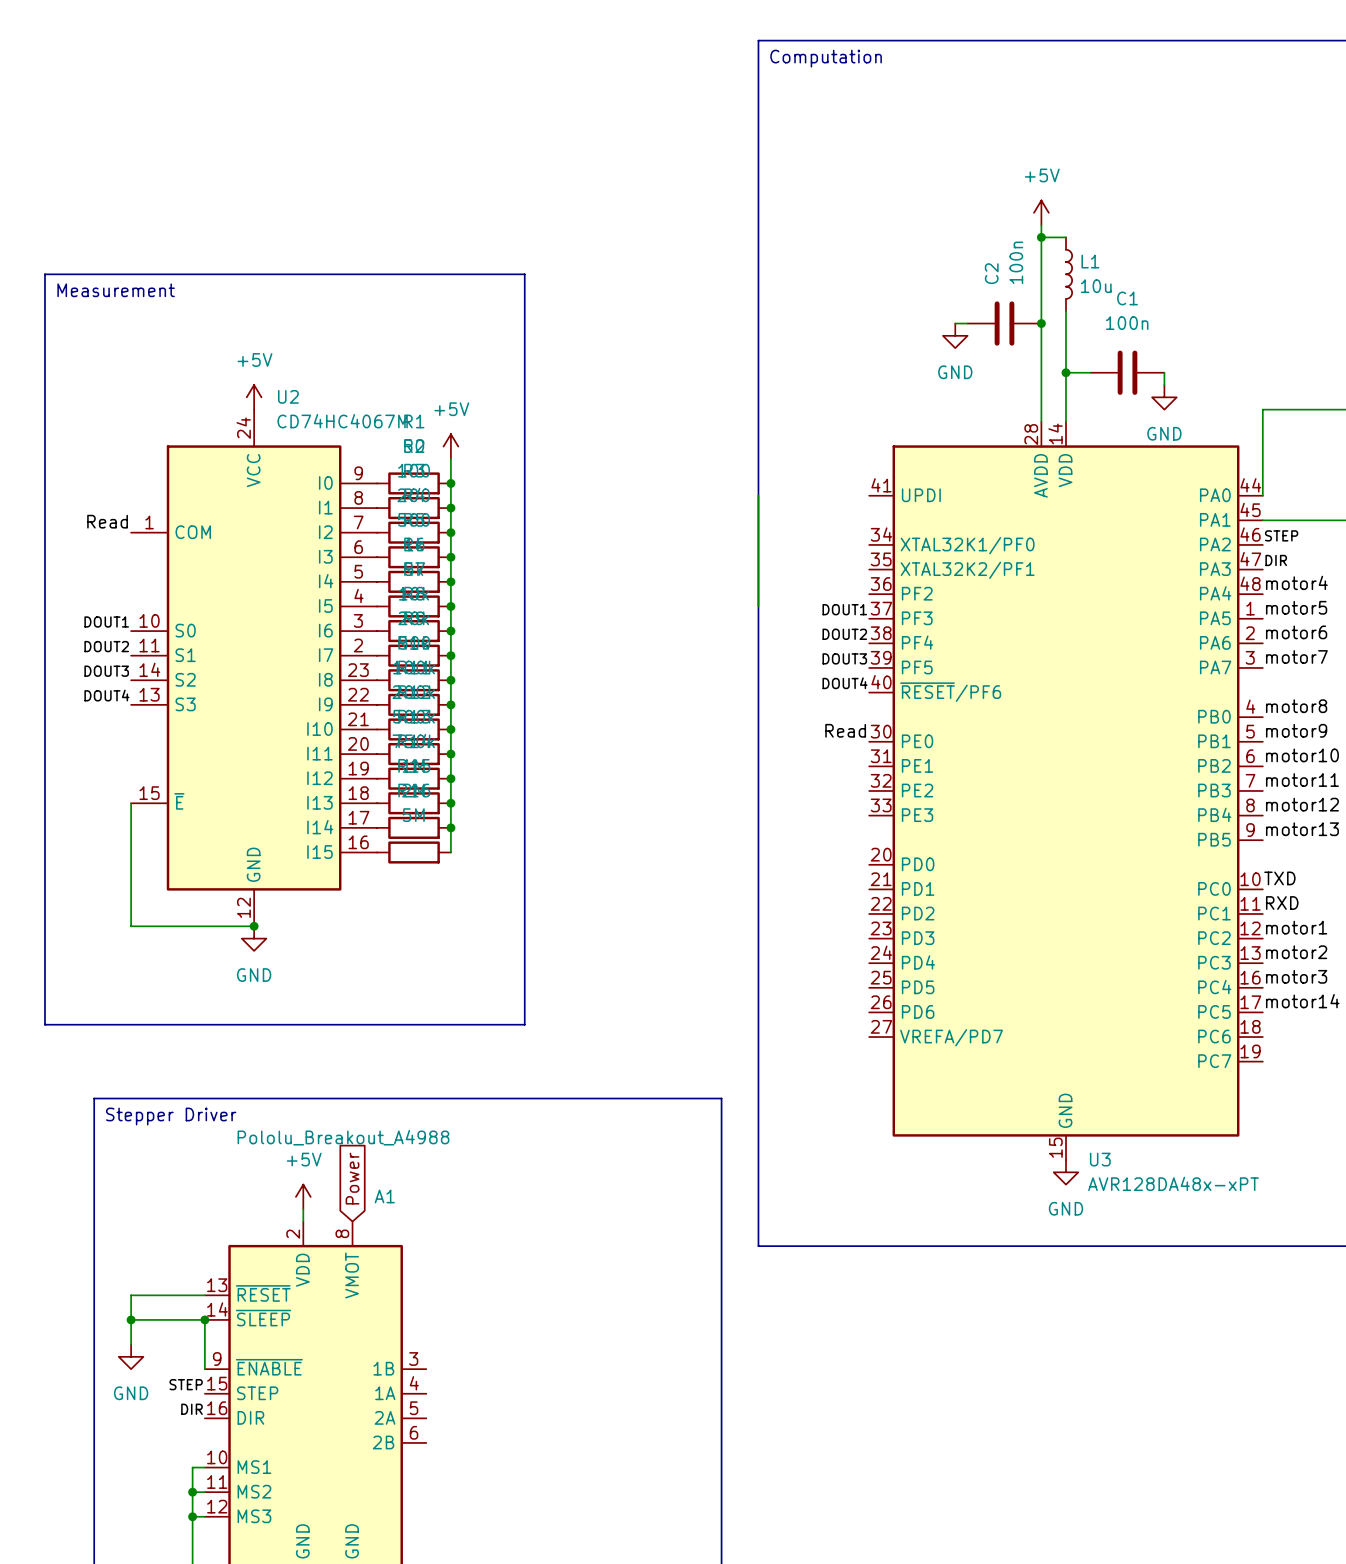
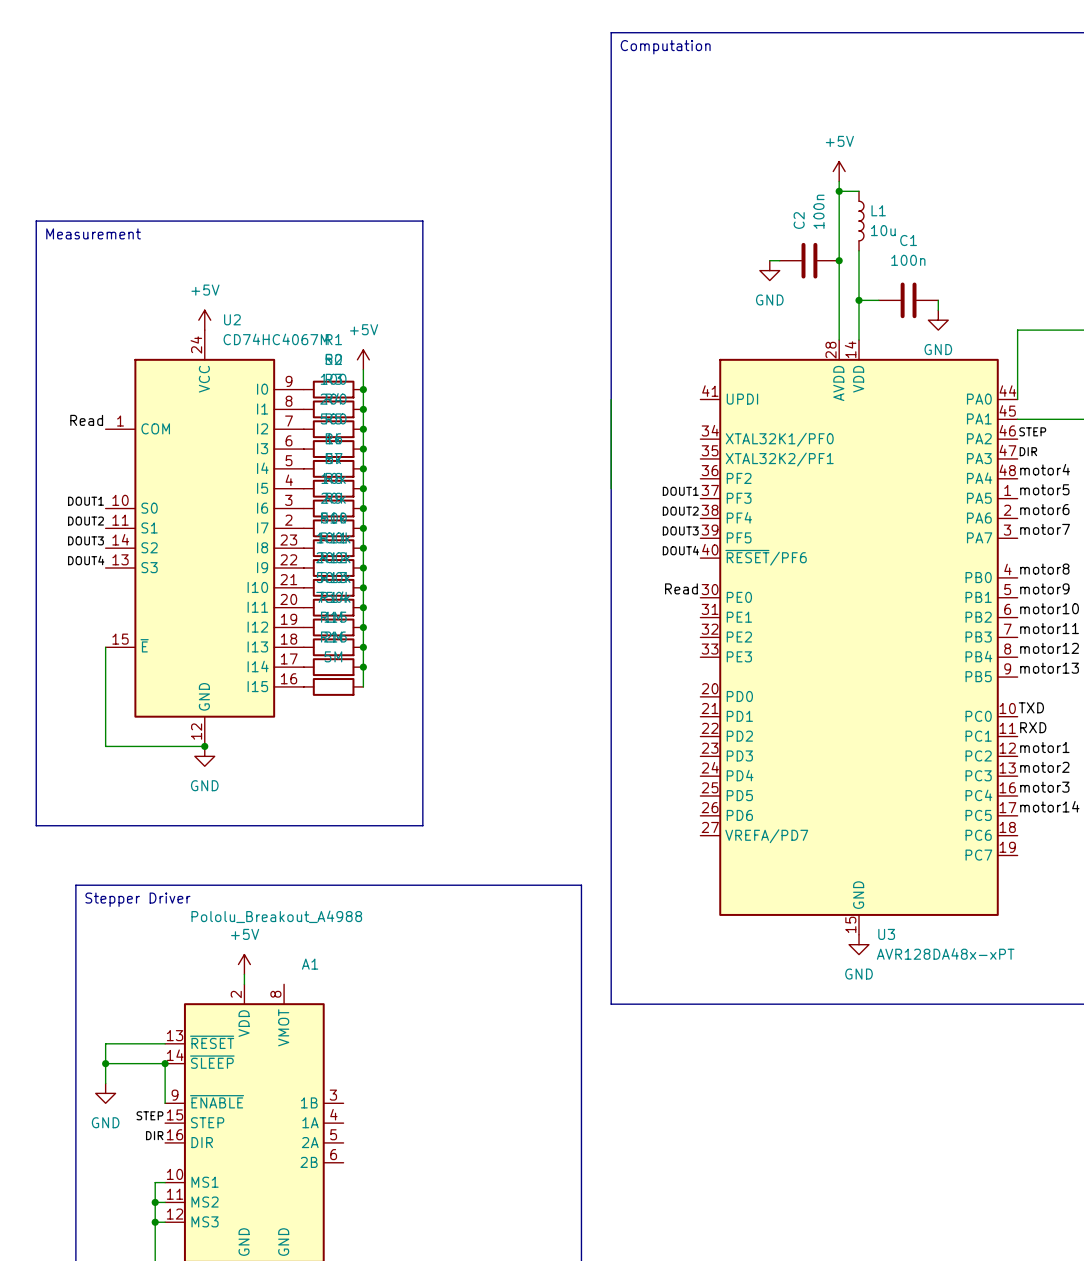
global label: Power (352, 1178) -> none

